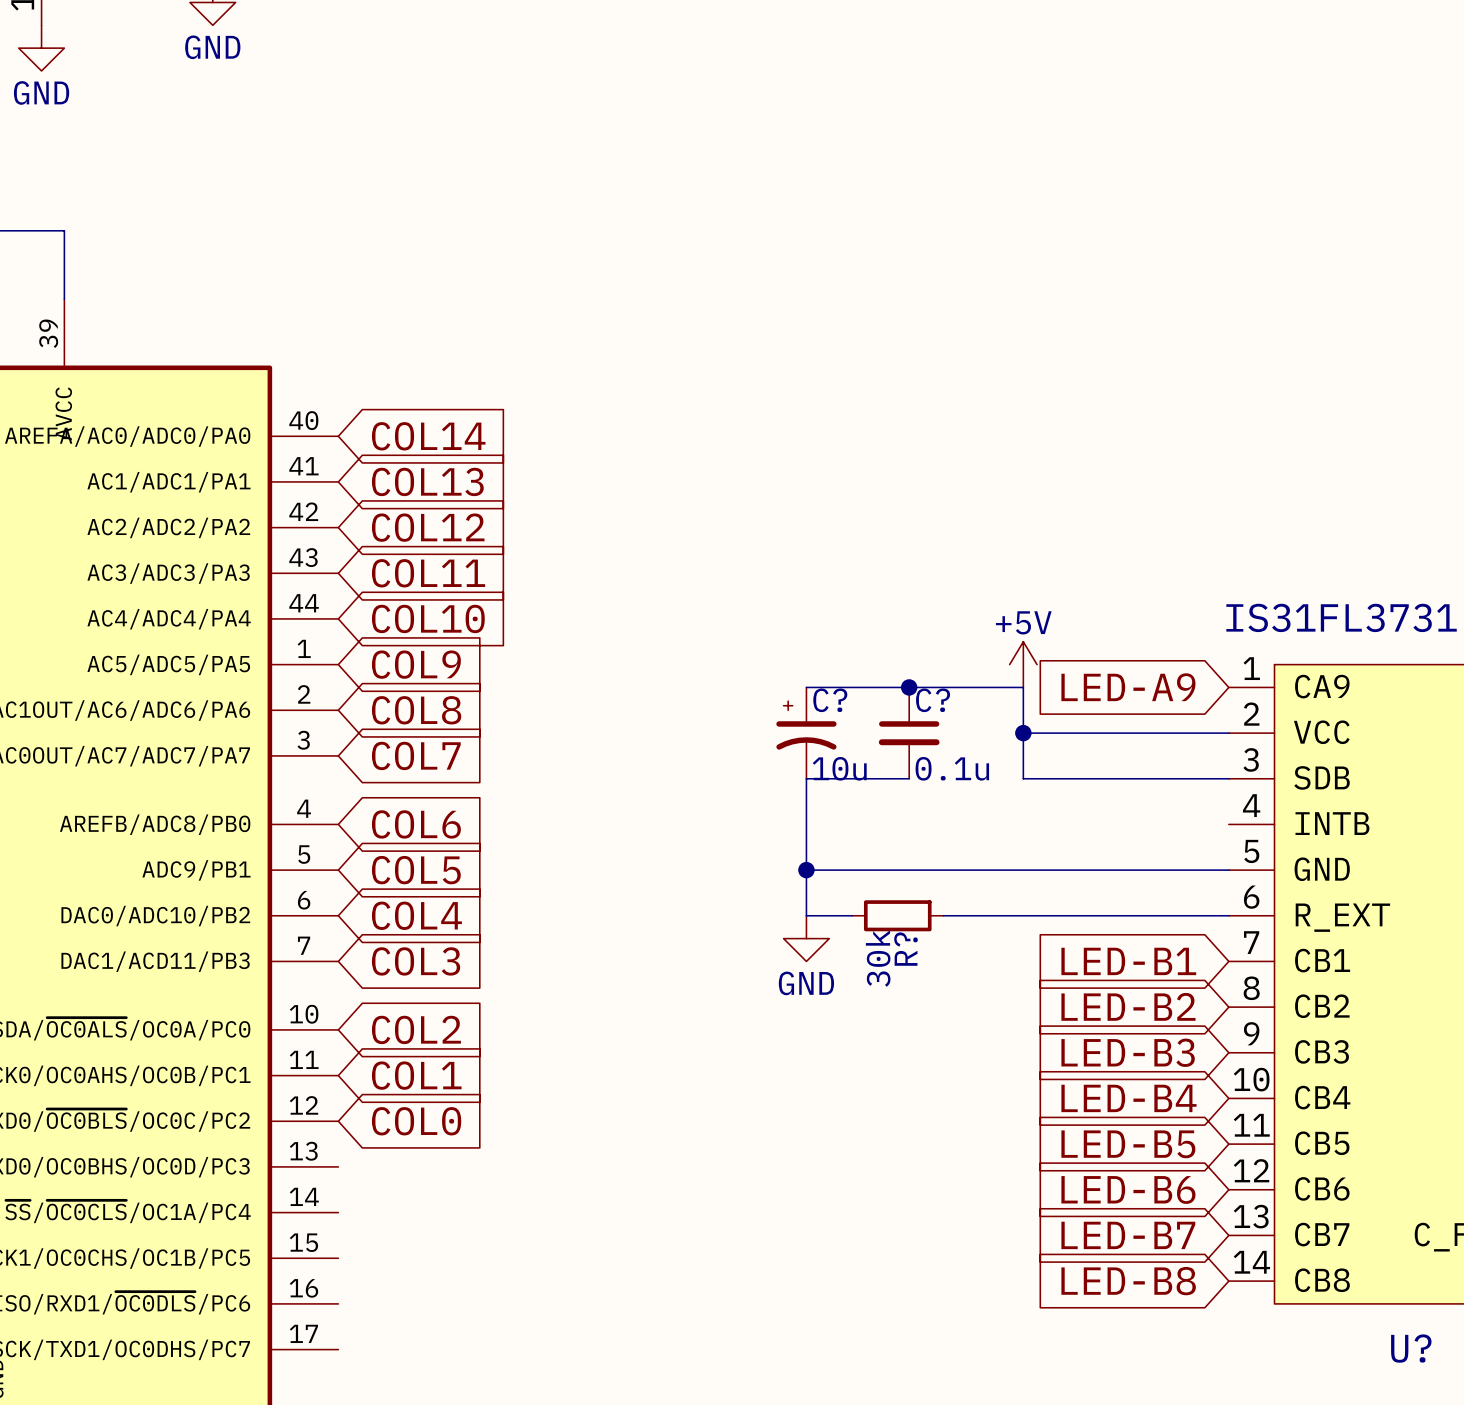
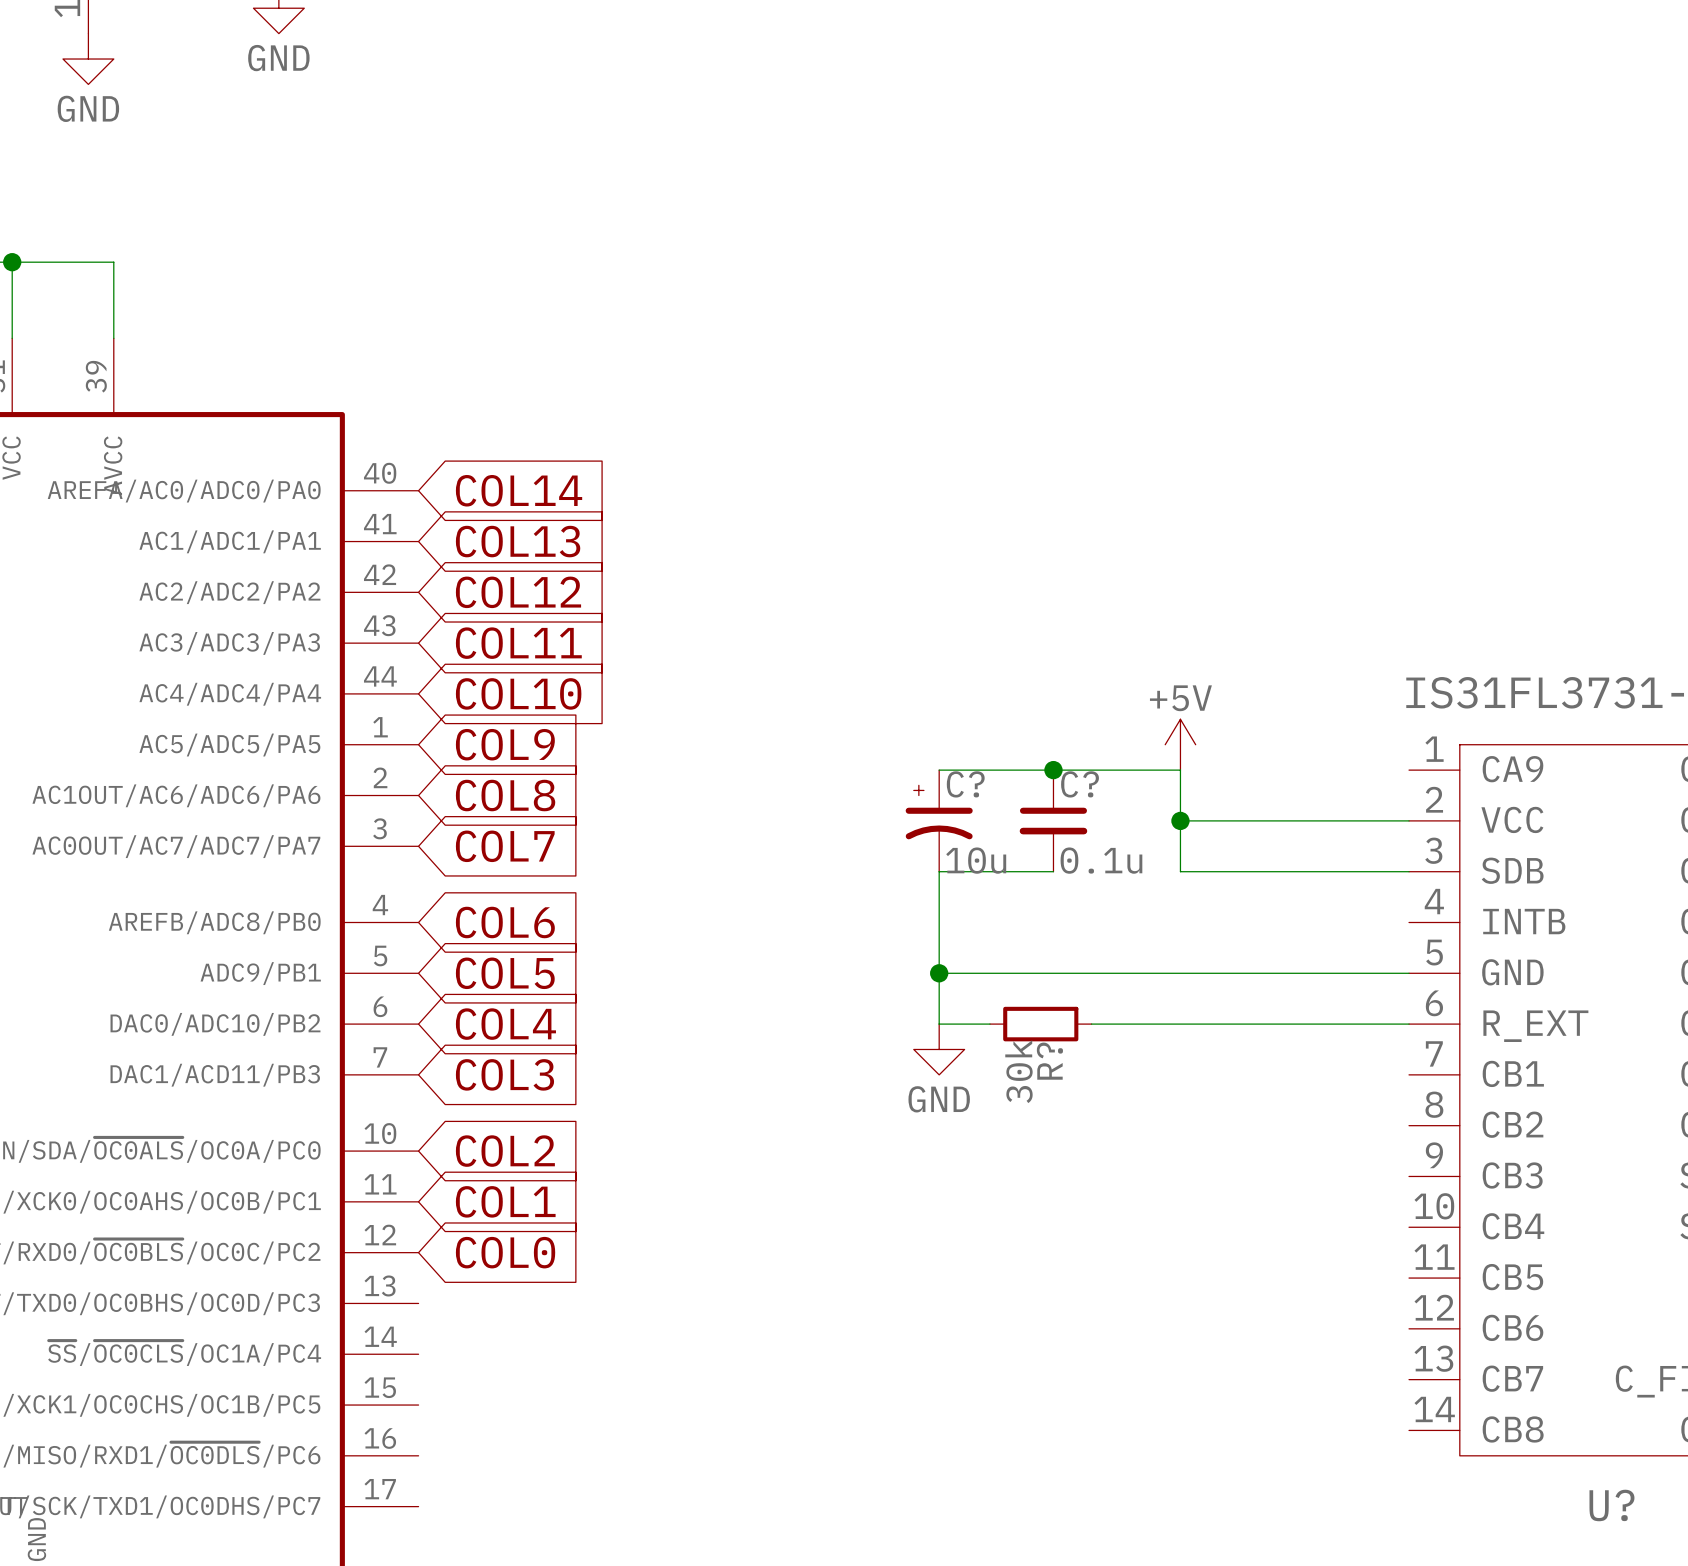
global label: LED-A9 (1128, 687) -> none
global label: LED-B1 (1128, 961) -> none
global label: LED-B2 (1128, 1006) -> none
global label: LED-B3 (1128, 1052) -> none
global label: LED-B4 (1128, 1098) -> none
global label: LED-B5 (1128, 1144) -> none
global label: LED-B6 (1128, 1190) -> none
global label: LED-B7 (1128, 1235) -> none
global label: LED-B8 (1128, 1281) -> none

